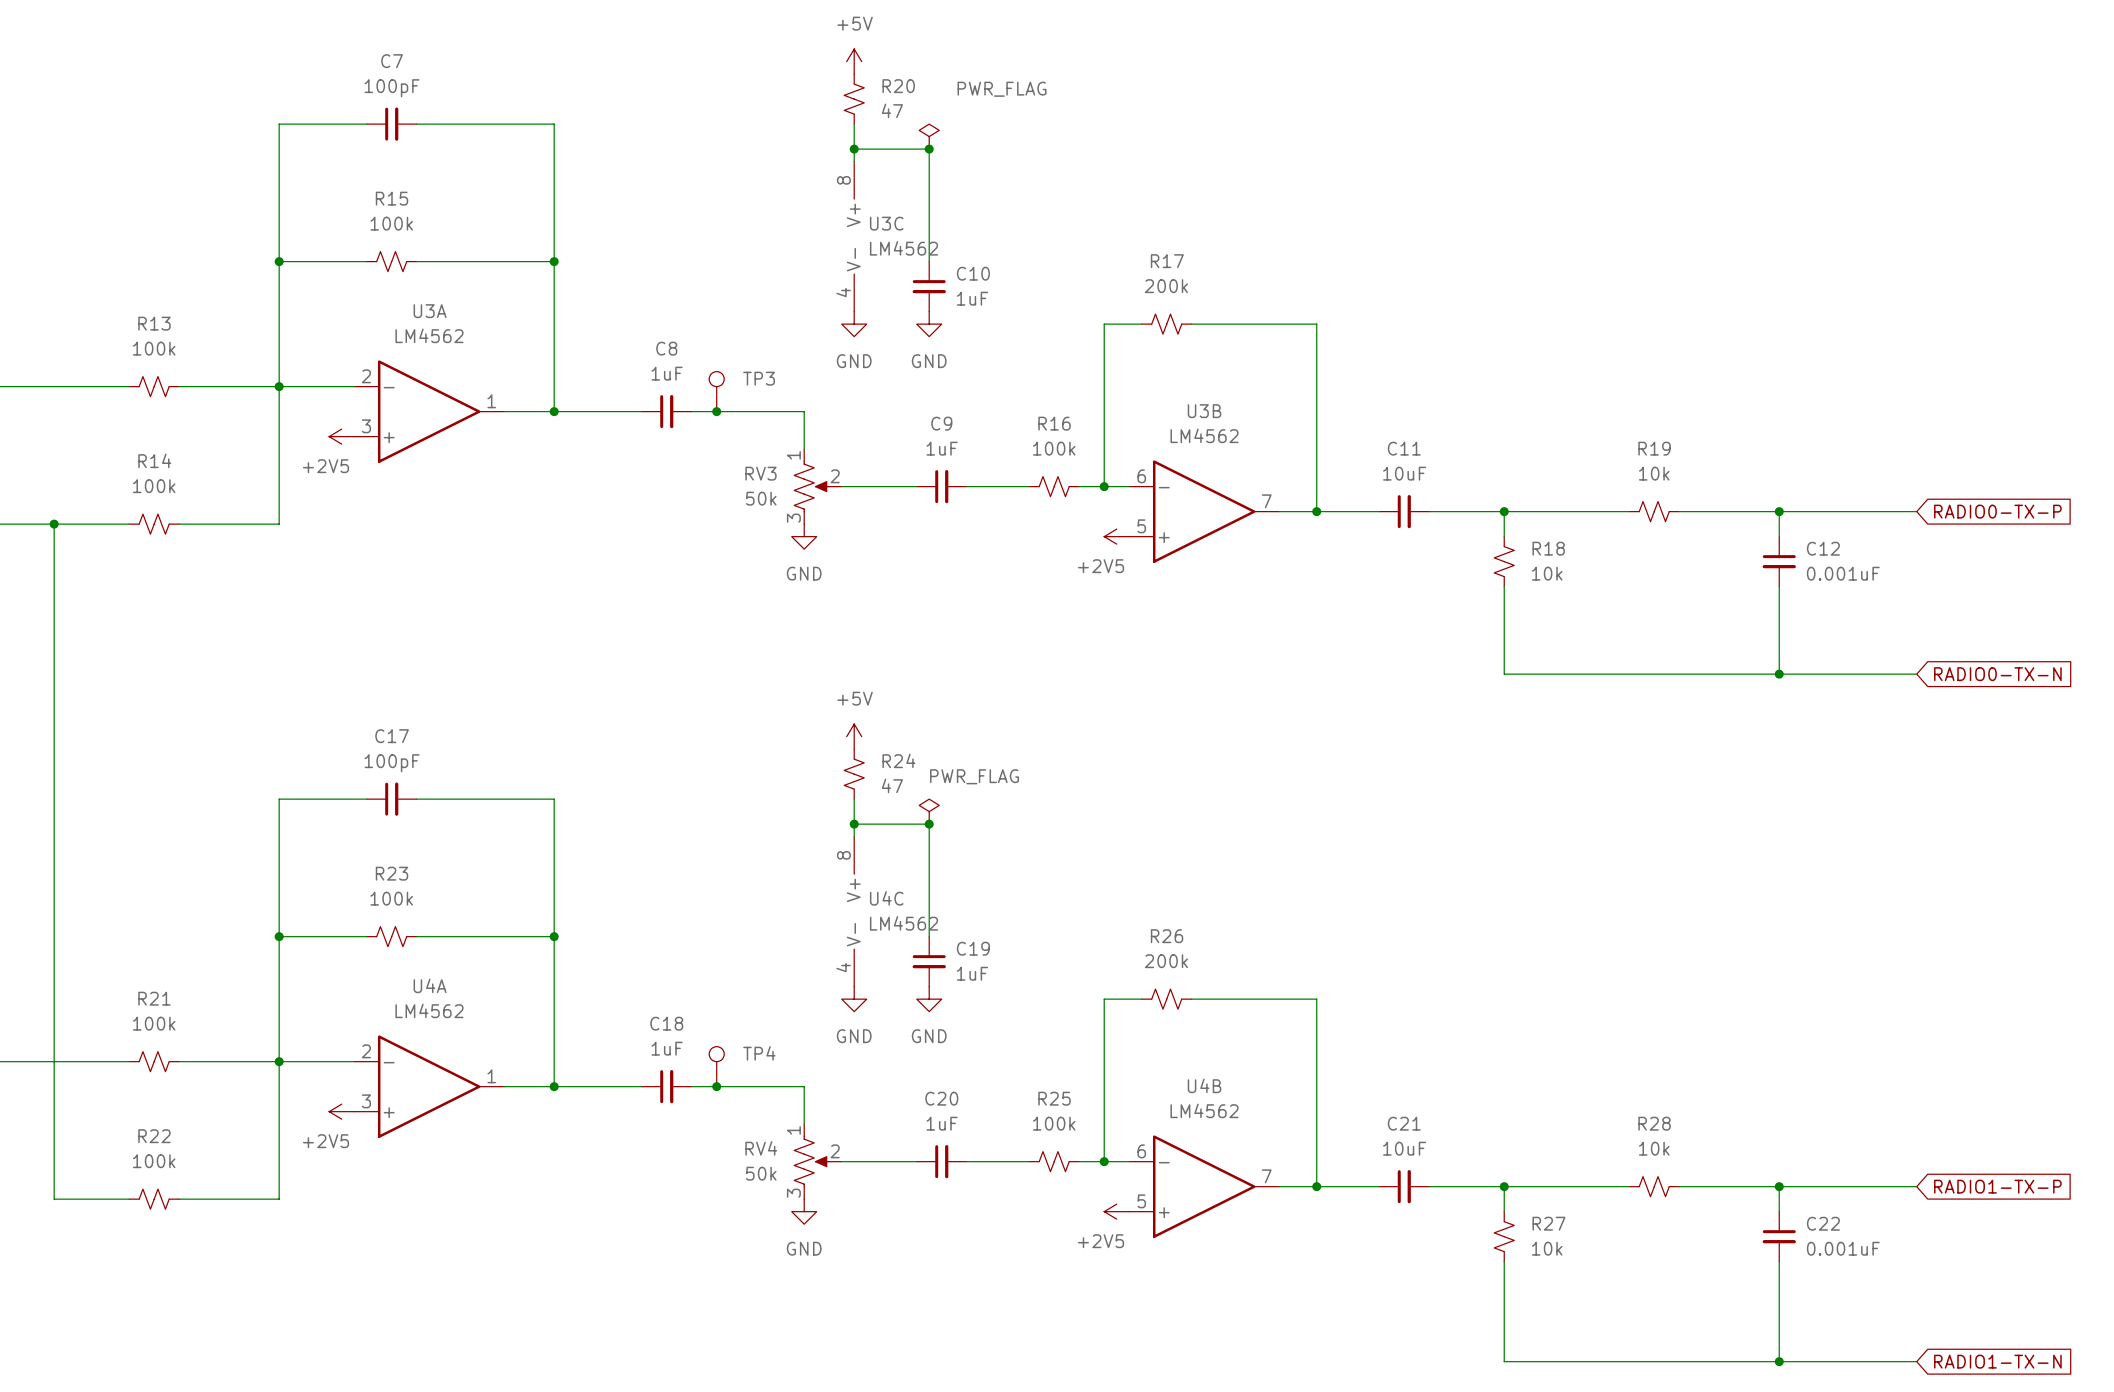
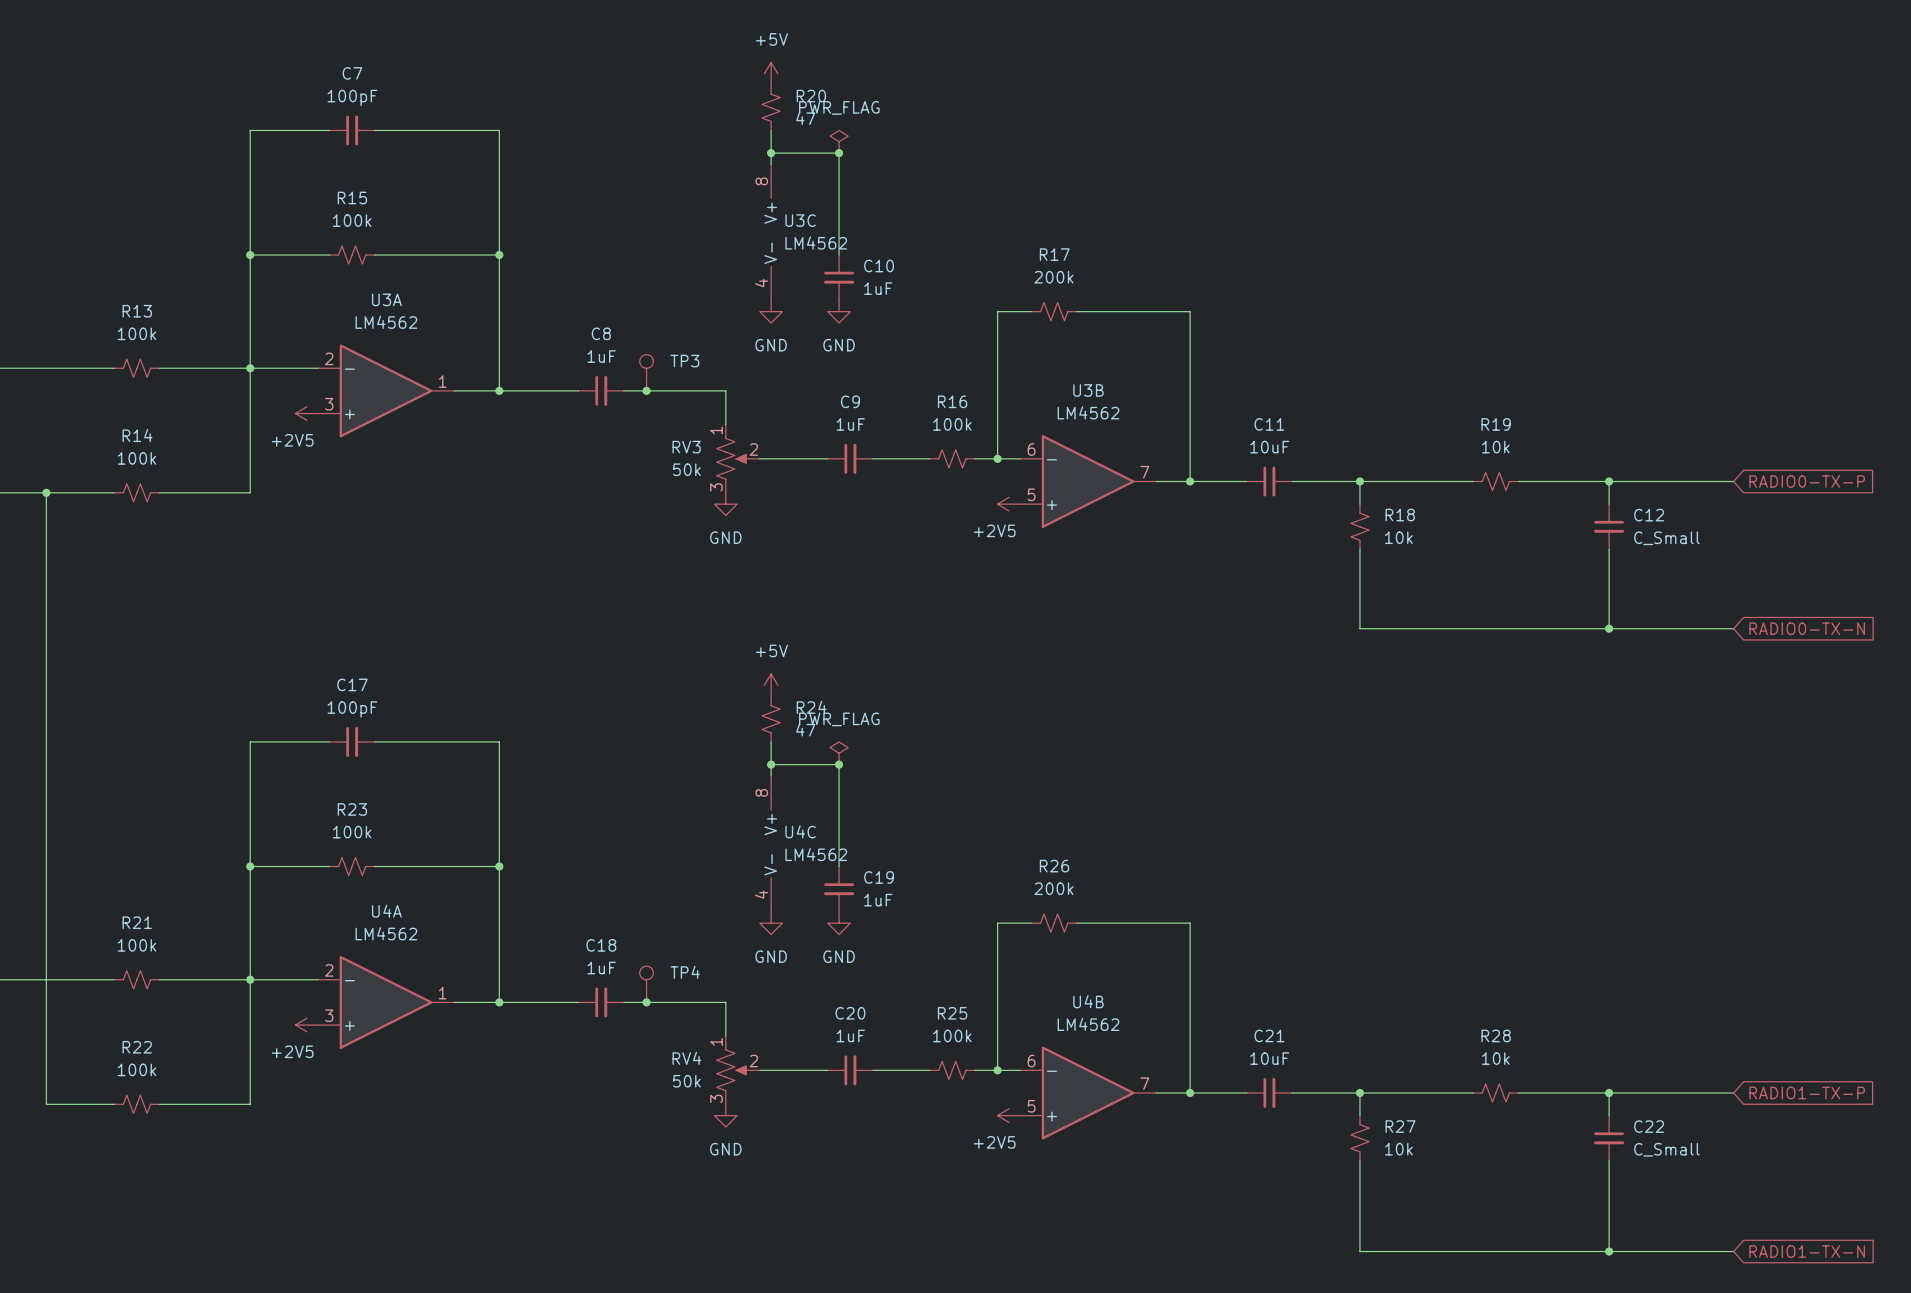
power symbol text position: PWR_FLAG (1002, 89) -> PWR_FLAG (839, 107)
C12 value: 0.001uF (1843, 573) -> C_Small (1666, 538)
power symbol text position: PWR_FLAG (974, 776) -> PWR_FLAG (839, 719)
C22 value: 0.001uF (1843, 1248) -> C_Small (1666, 1149)

